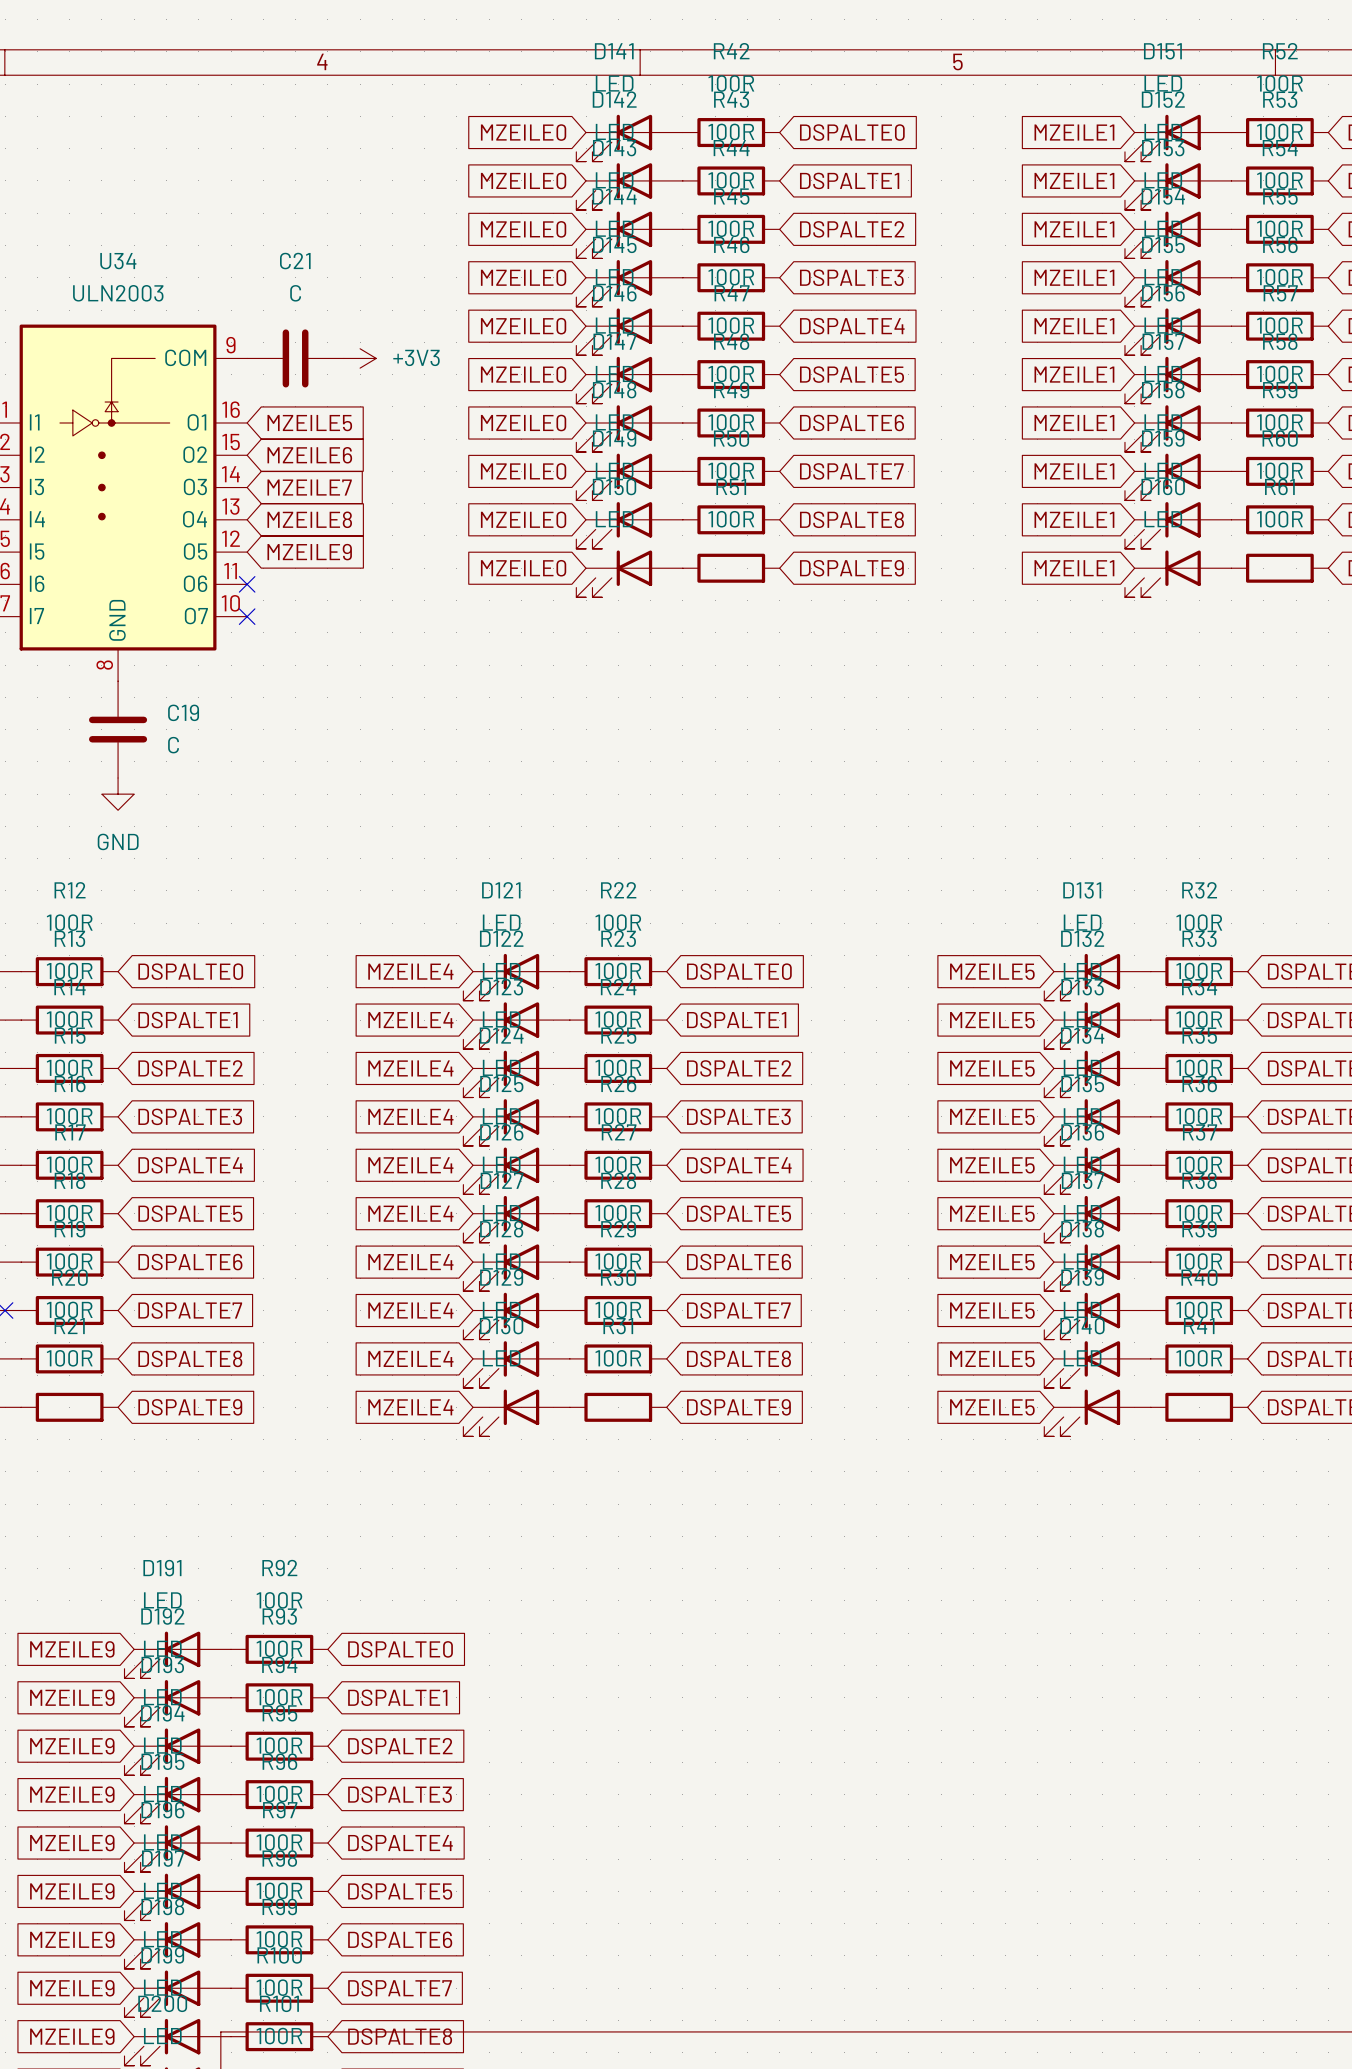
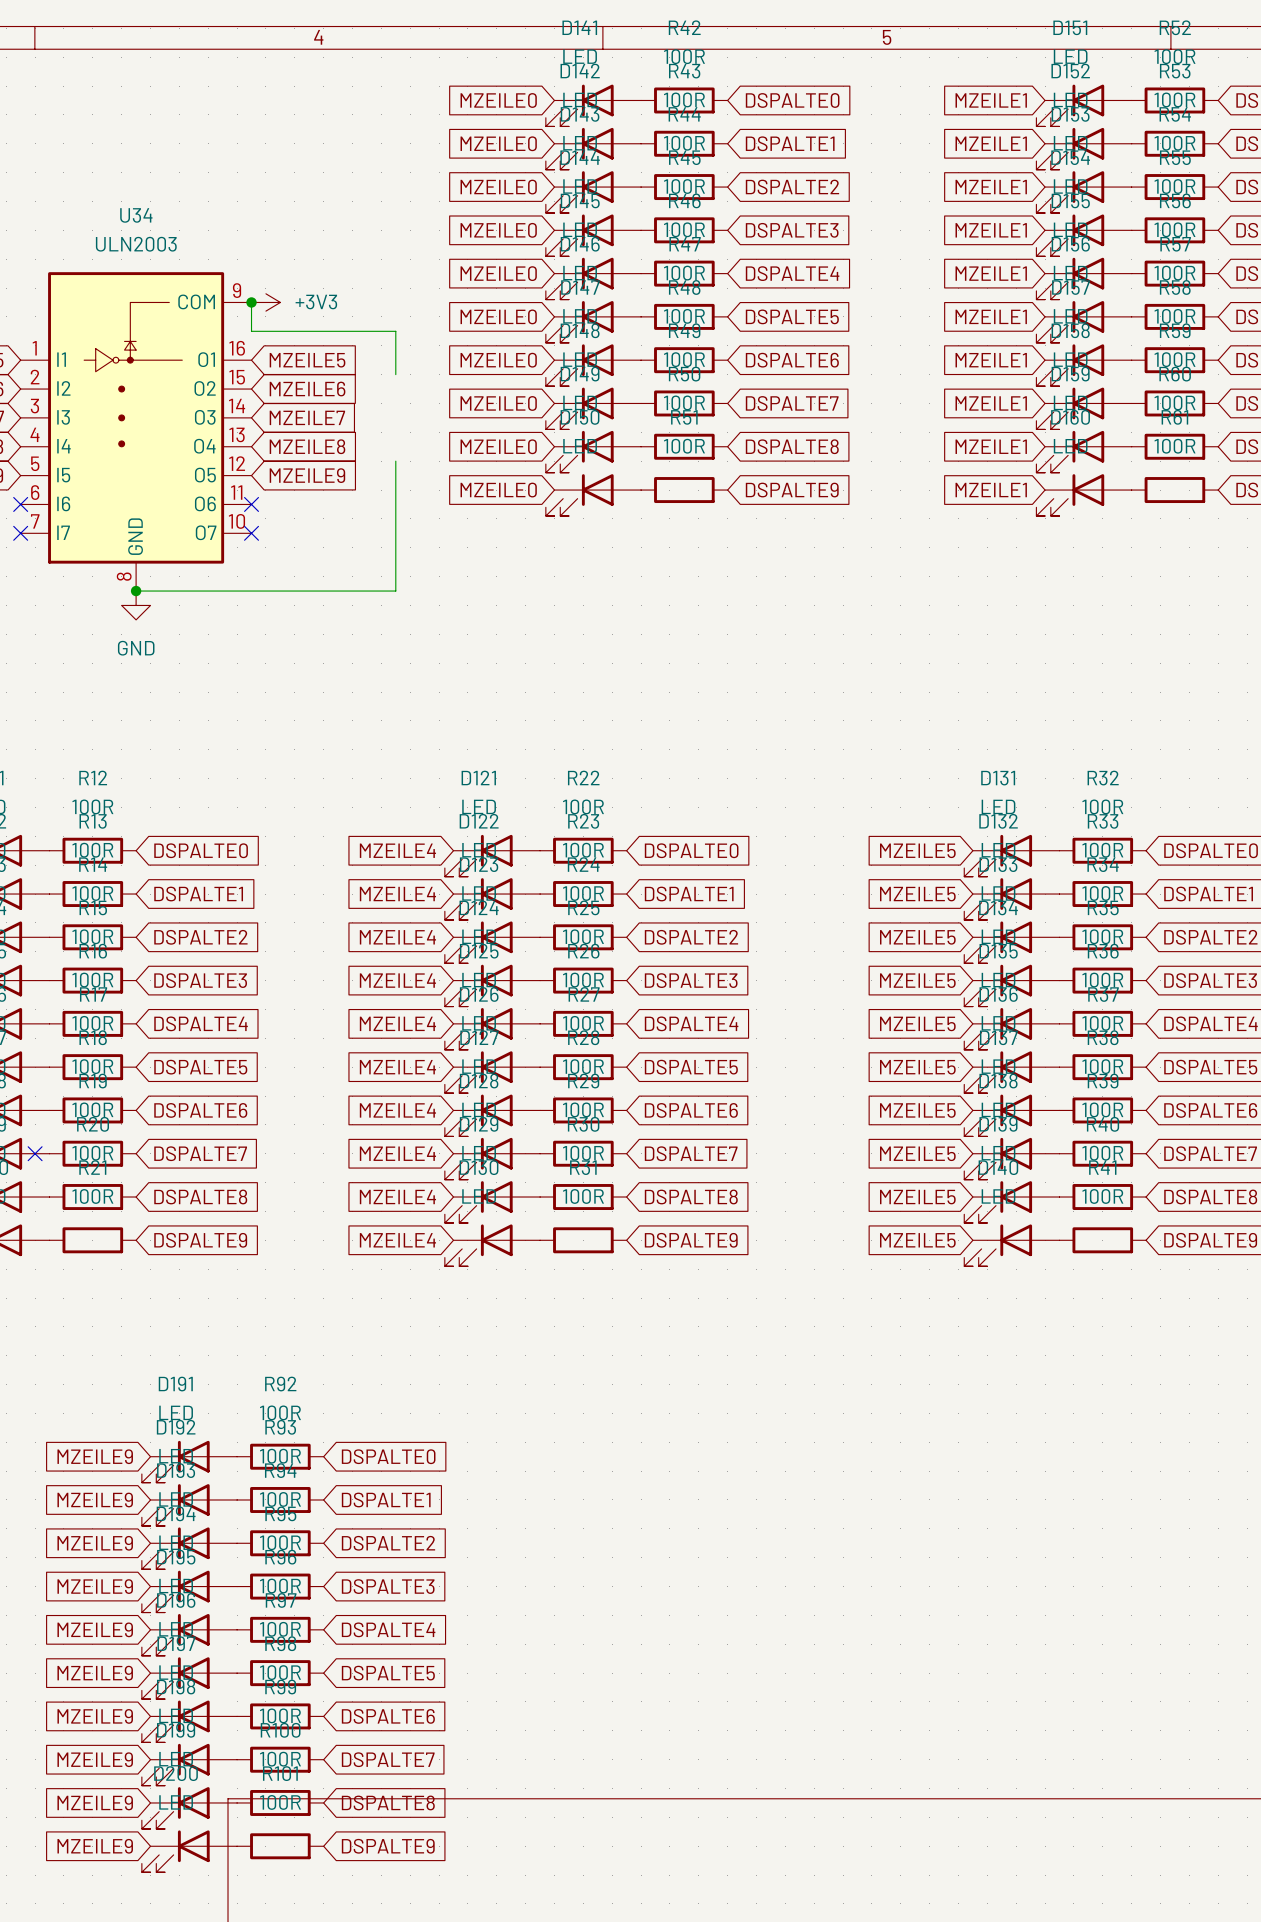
wire: none -> (251, 302) (251, 331) (395, 331) (395, 374)
junction: none -> (251, 302)
C21: C (295, 358) -> none
power symbol position: +3V3 (360, 358) -> +3V3 (265, 302)
wire: none -> (395, 461) (395, 591) (136, 591)
junction: none -> (136, 591)
C19: C (118, 729) -> none
power symbol position: GND (118, 794) -> GND (136, 605)

